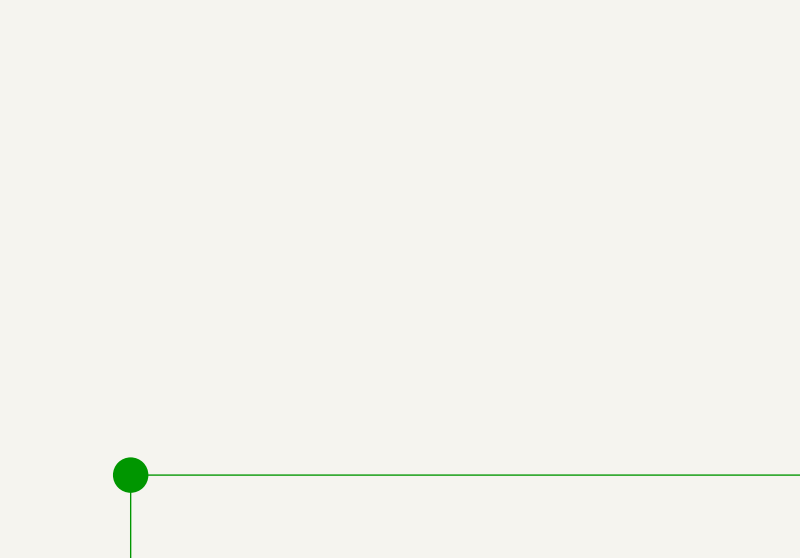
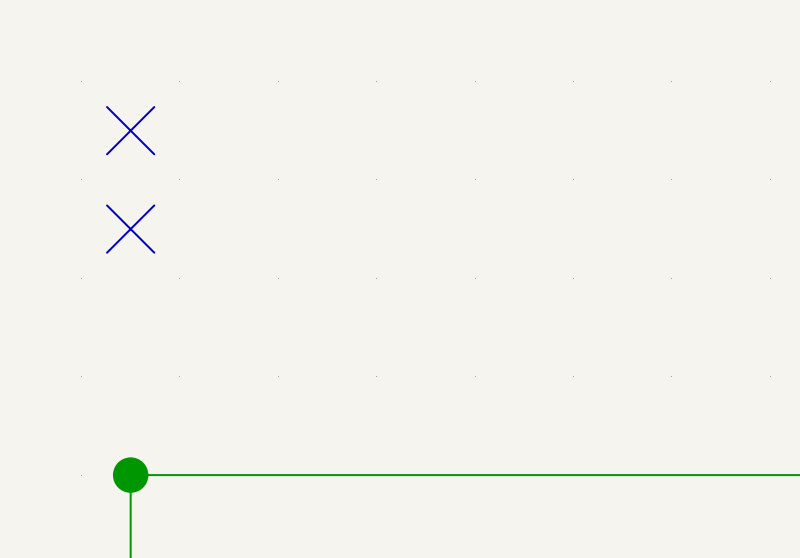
no-connect mark: none -> (130, 130)
no-connect mark: none -> (130, 229)

